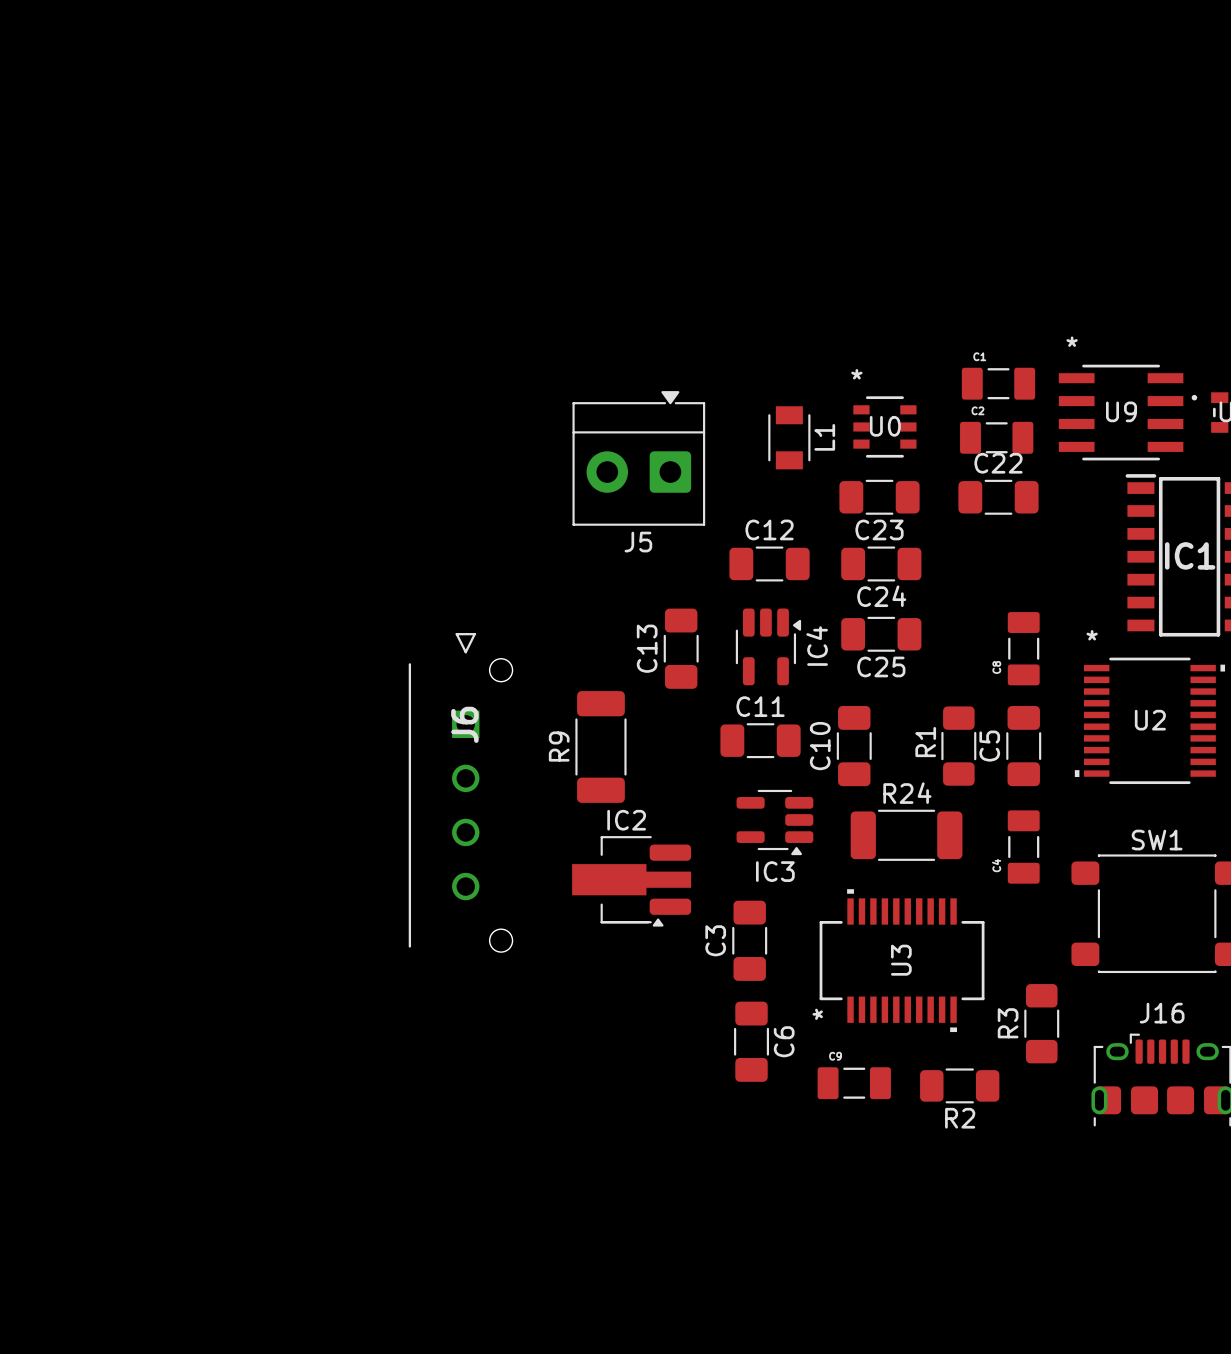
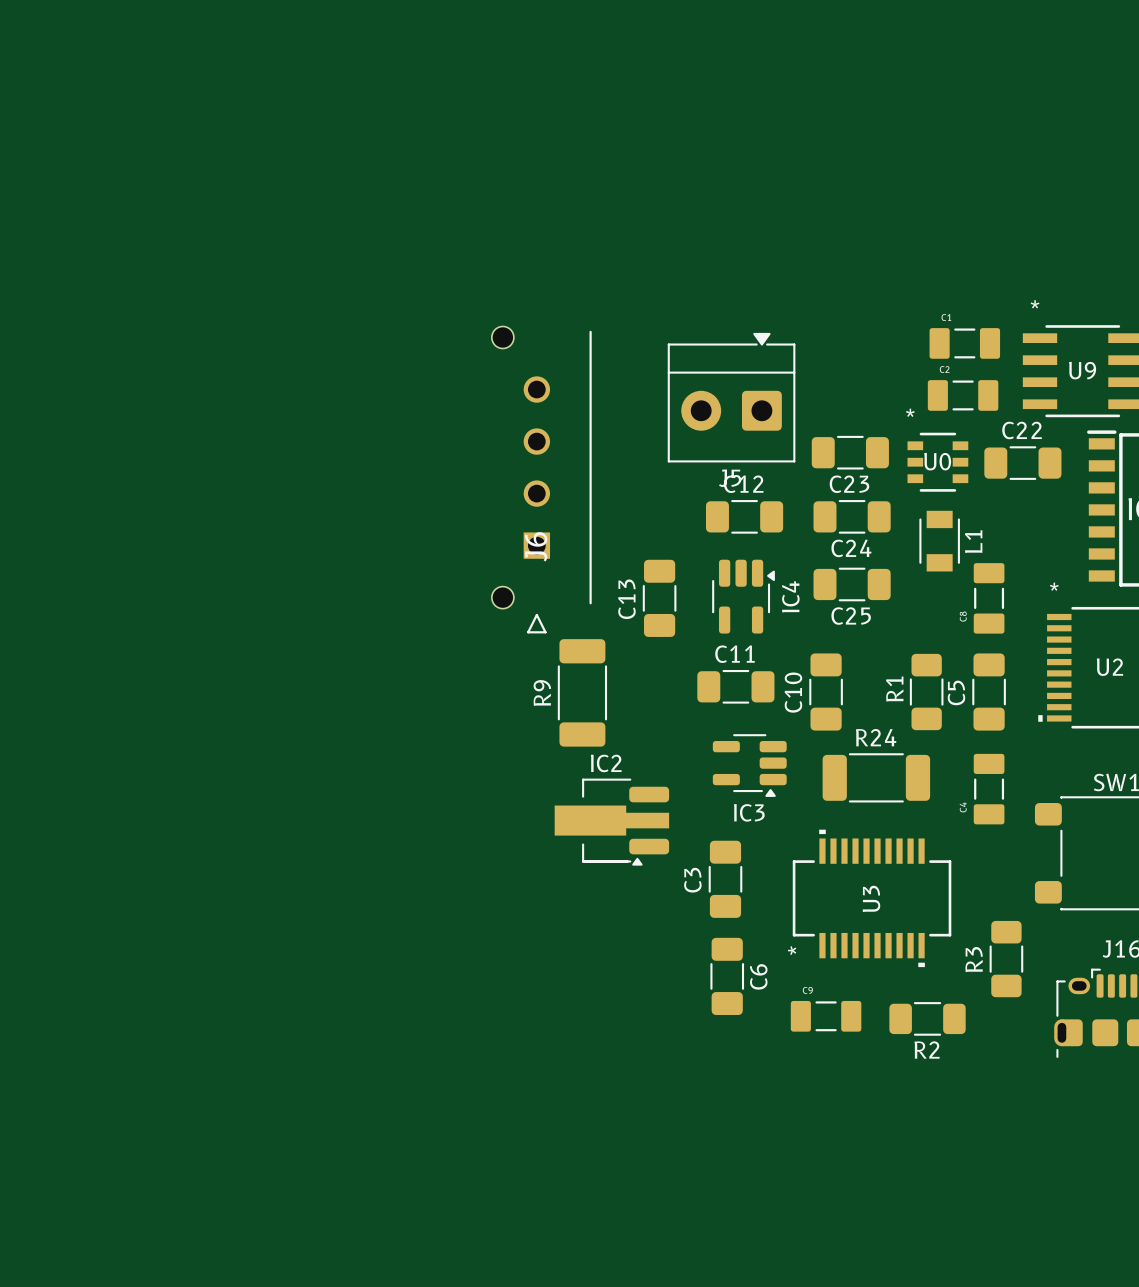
U0 position: (884, 426) -> (937, 462)
L1 position: (789, 437) -> (939, 541)
J5 position: (638, 458) -> (731, 397)
C22 position: (998, 497) -> (1022, 463)
J6 rotation: 0° (460, 792) -> 180° (541, 479)
J6 position: (460, 792) -> (541, 479)

